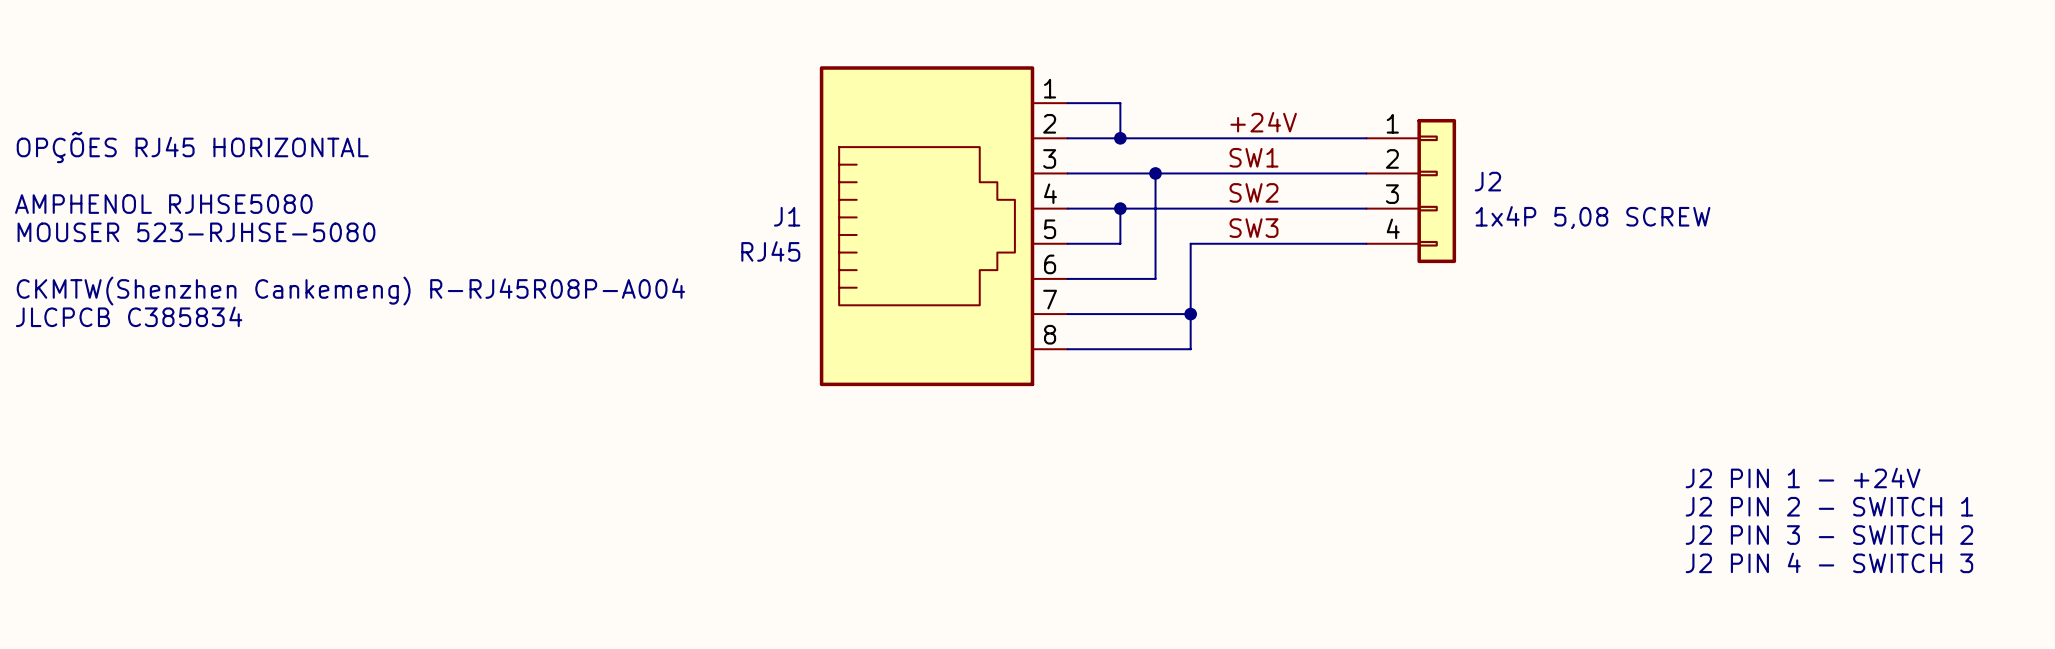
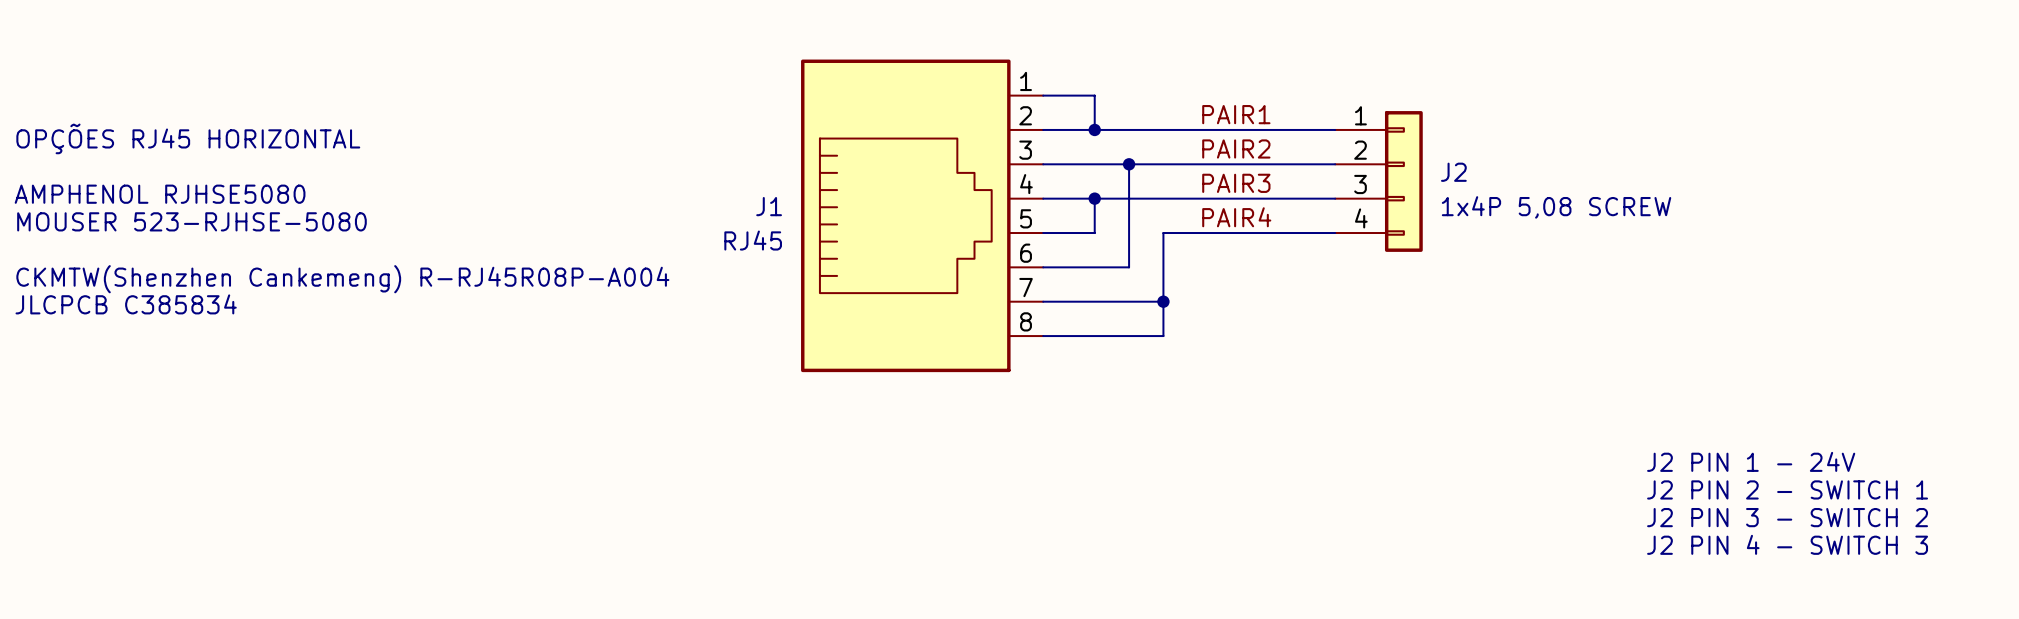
label: +24V (1263, 122) -> PAIR1 (1236, 114)
label: SW1 (1254, 157) -> PAIR2 (1236, 148)
label: SW2 (1254, 192) -> PAIR3 (1236, 183)
label: SW3 (1254, 228) -> PAIR4 (1236, 217)
text: J2 PIN 1 - +24V (1803, 478) -> J2 PIN 1 - 24V (1751, 461)

